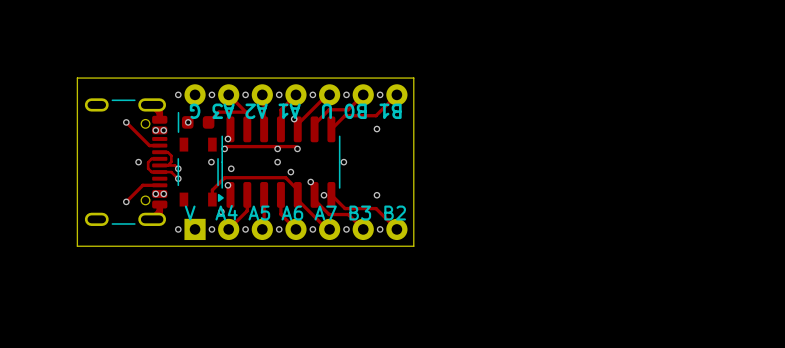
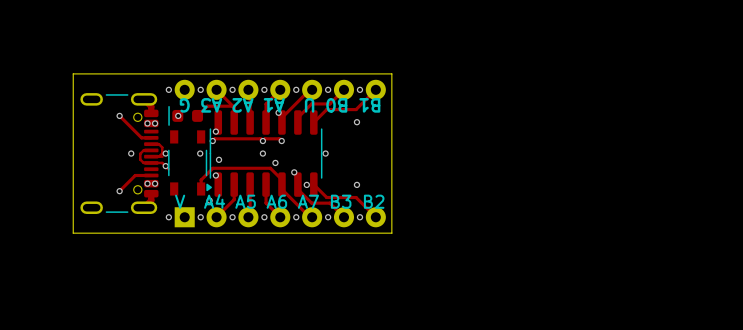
via: none -> (165, 153)
track: (171, 165) (178, 168) -> none
via: (178, 168) -> none
via: none -> (165, 166)
via: (178, 178) -> none

